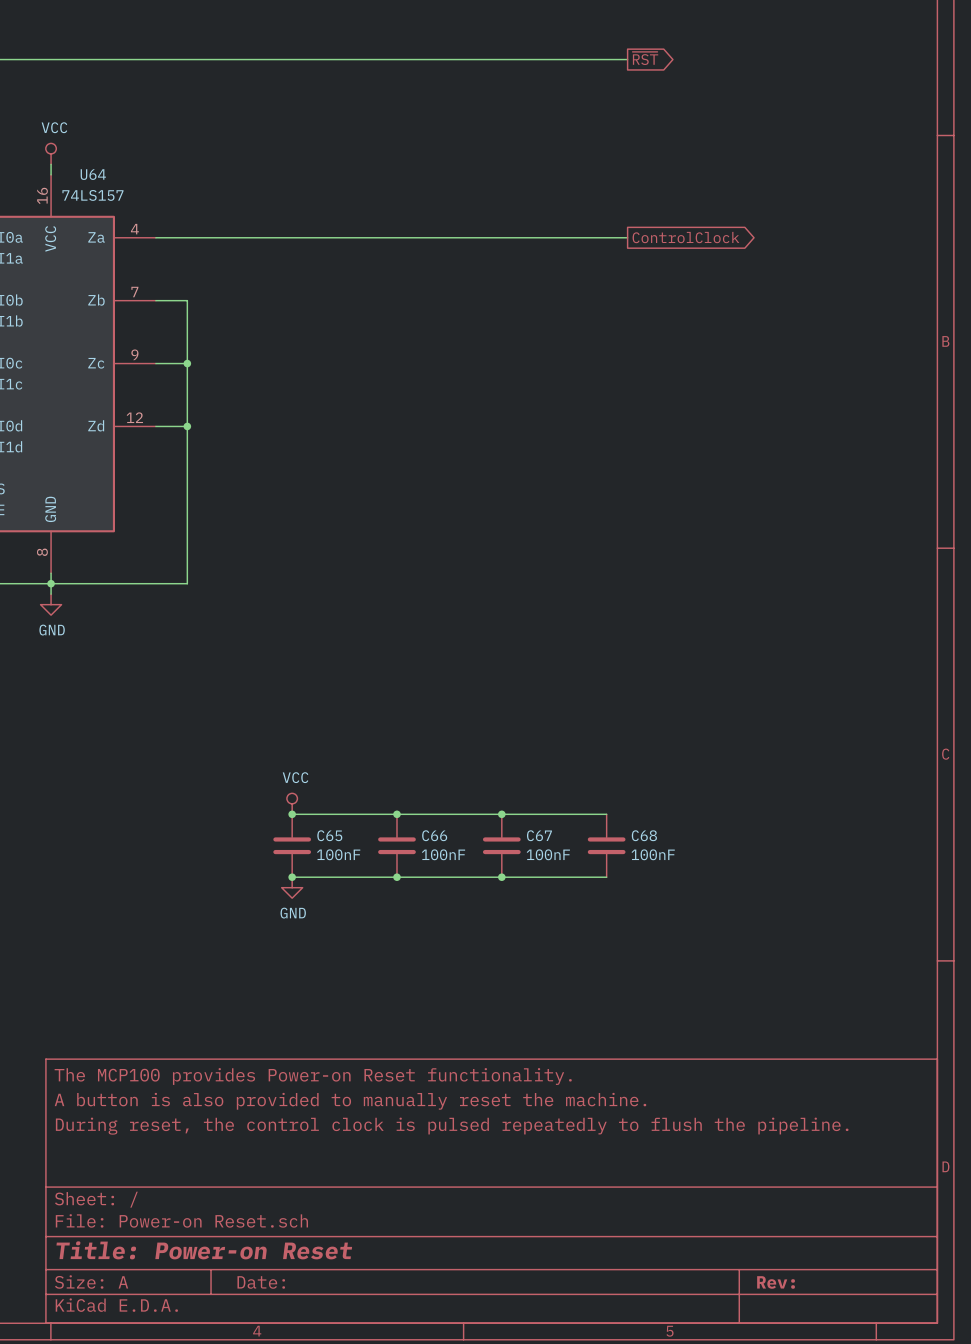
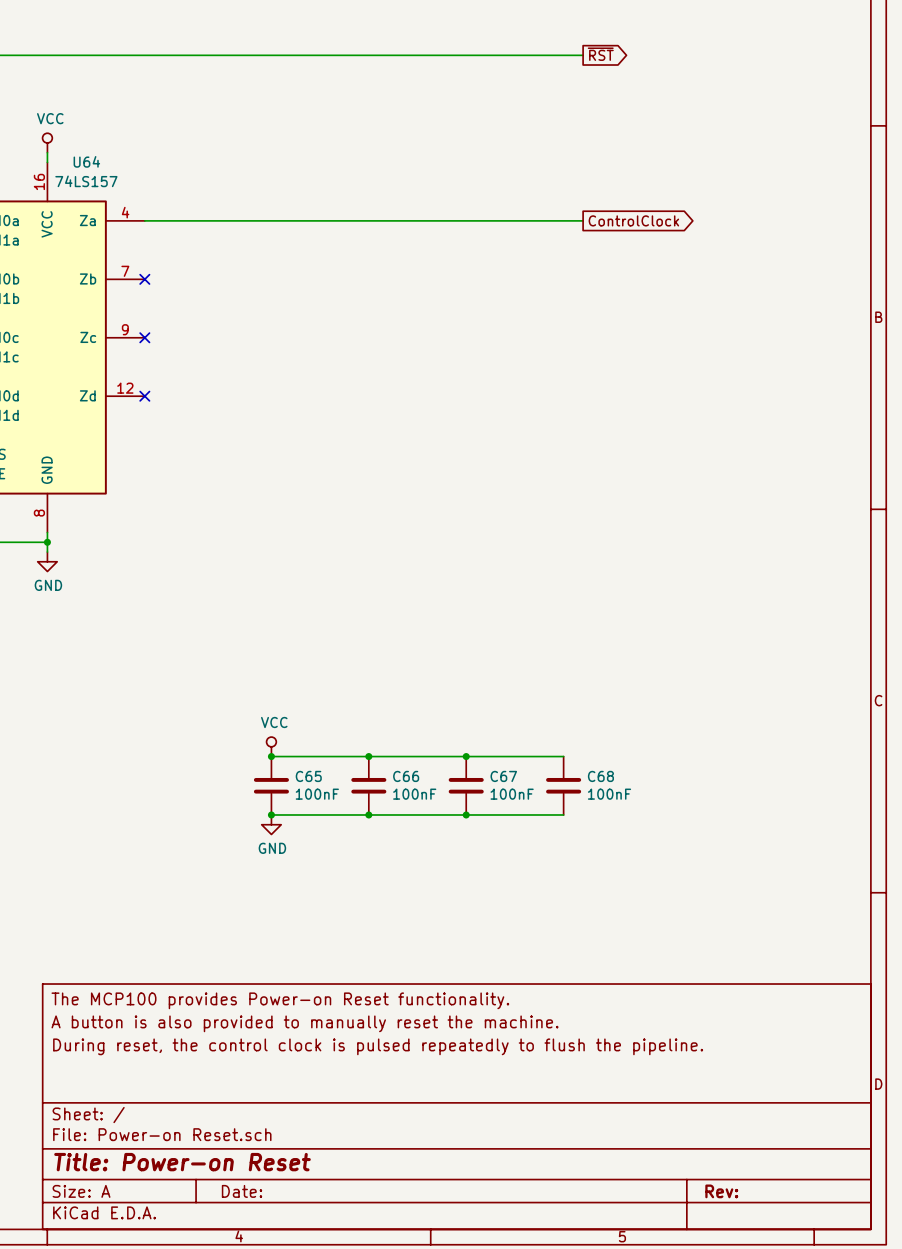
wire: (155, 300) (187, 300) (187, 583) (51, 583) -> none
no-connect mark: none -> (144, 279)
wire: (155, 363) (187, 363) -> none
no-connect mark: none -> (144, 337)
junction: (187, 363) -> none
wire: (155, 426) (187, 426) -> none
no-connect mark: none -> (144, 396)
junction: (187, 426) -> none

